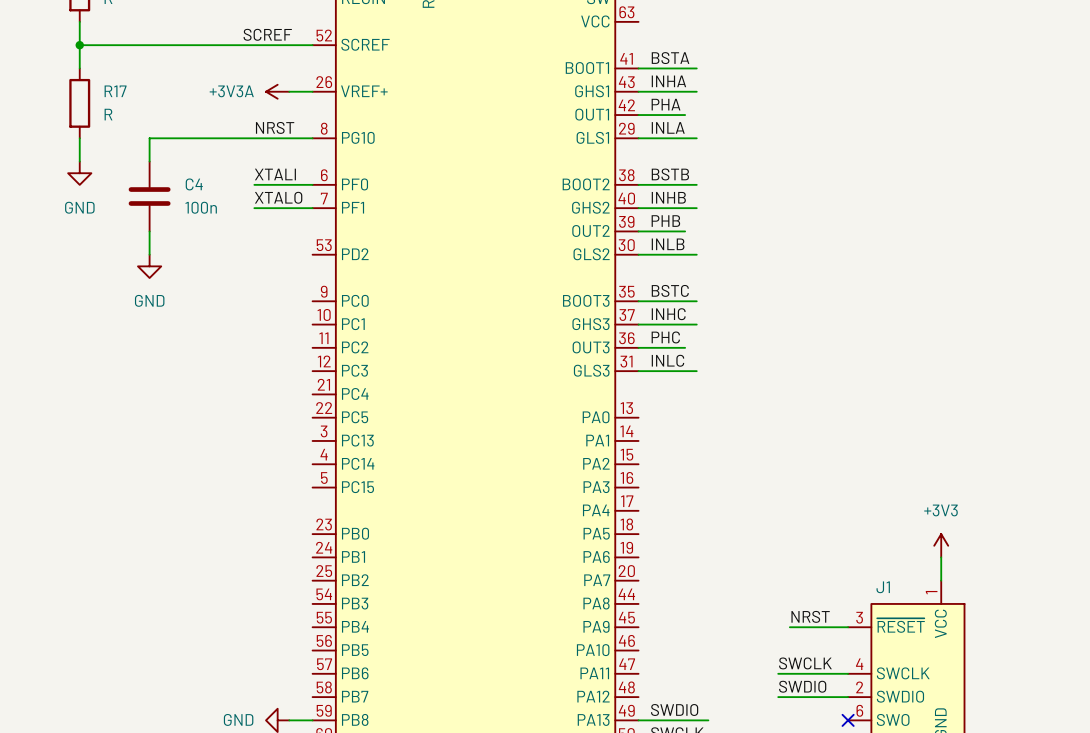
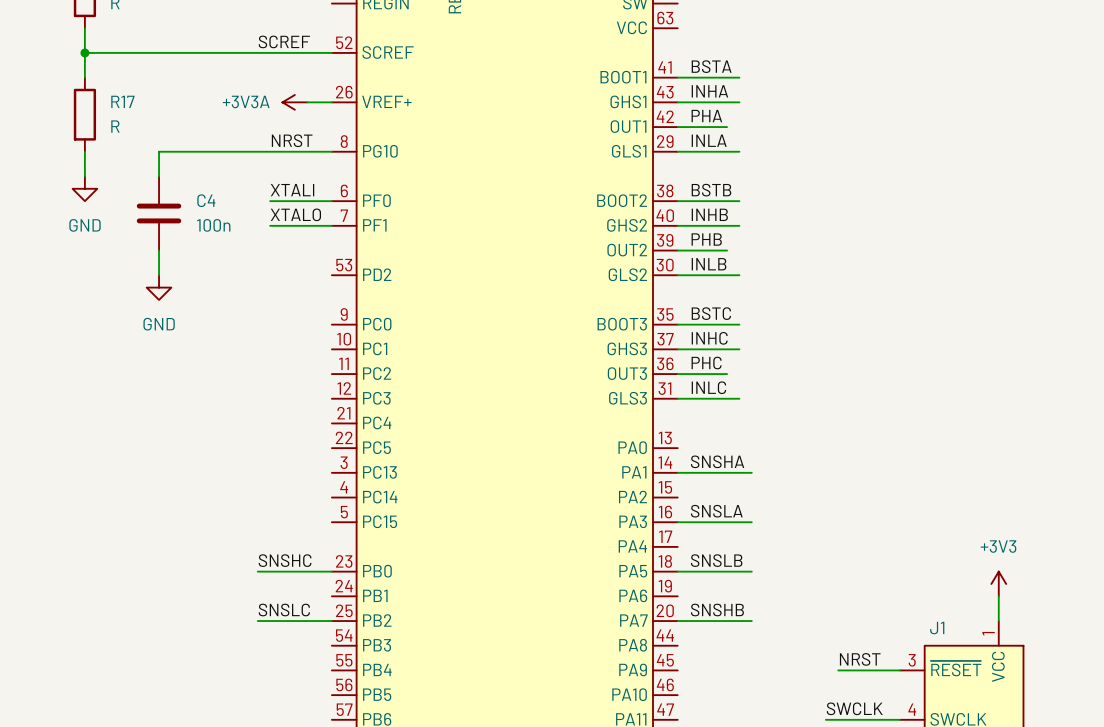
label: none -> SNSHA (717, 461)
wire: none -> (677, 472) (751, 472)
label: none -> SNSLA (716, 511)
wire: none -> (677, 522) (751, 522)
label: none -> SNSHC (285, 560)
label: none -> SNSLB (716, 560)
wire: none -> (257, 571) (331, 571)
wire: none -> (677, 571) (751, 571)
label: none -> SNSLC (284, 610)
label: none -> SNSHB (717, 610)
wire: none -> (257, 621) (331, 621)
wire: none -> (677, 621) (751, 621)

